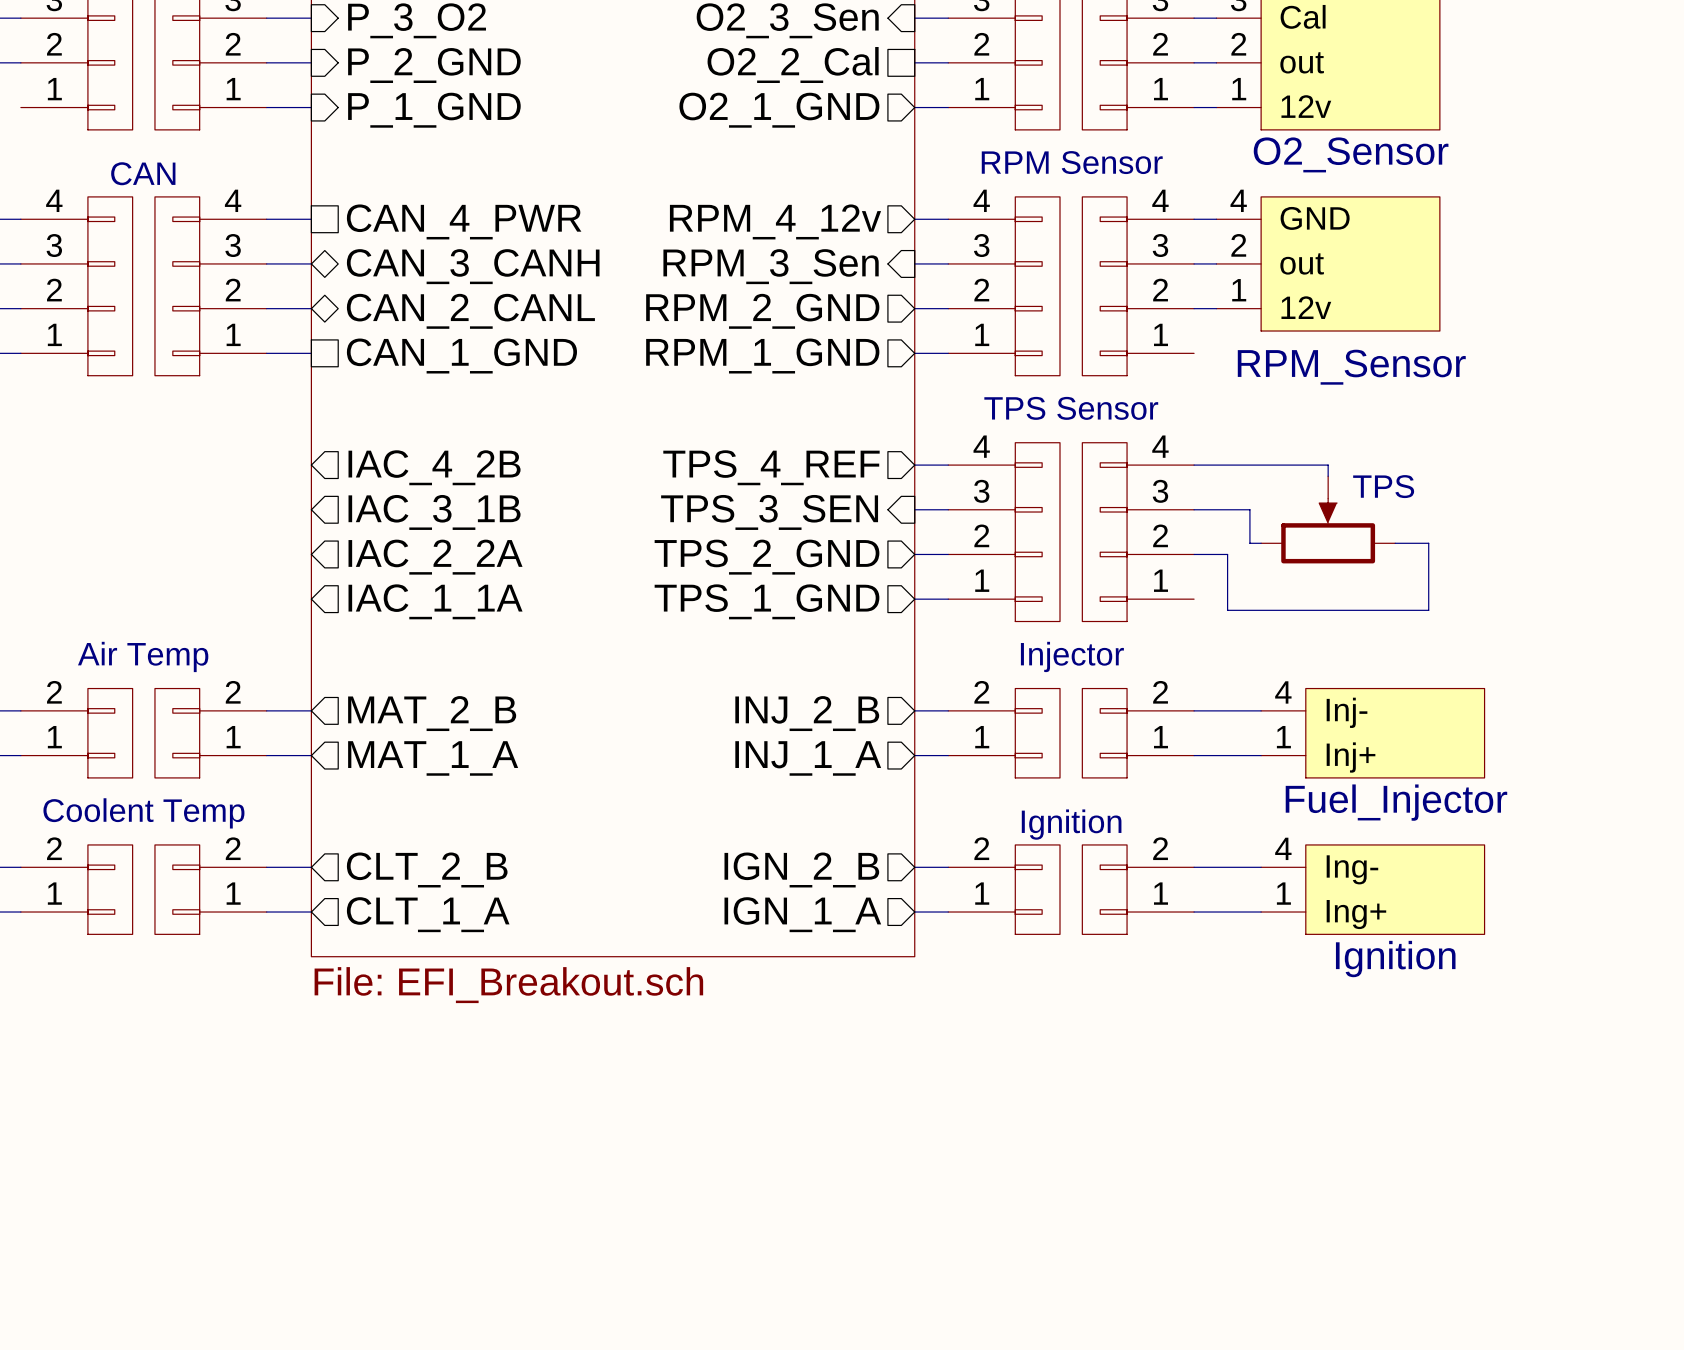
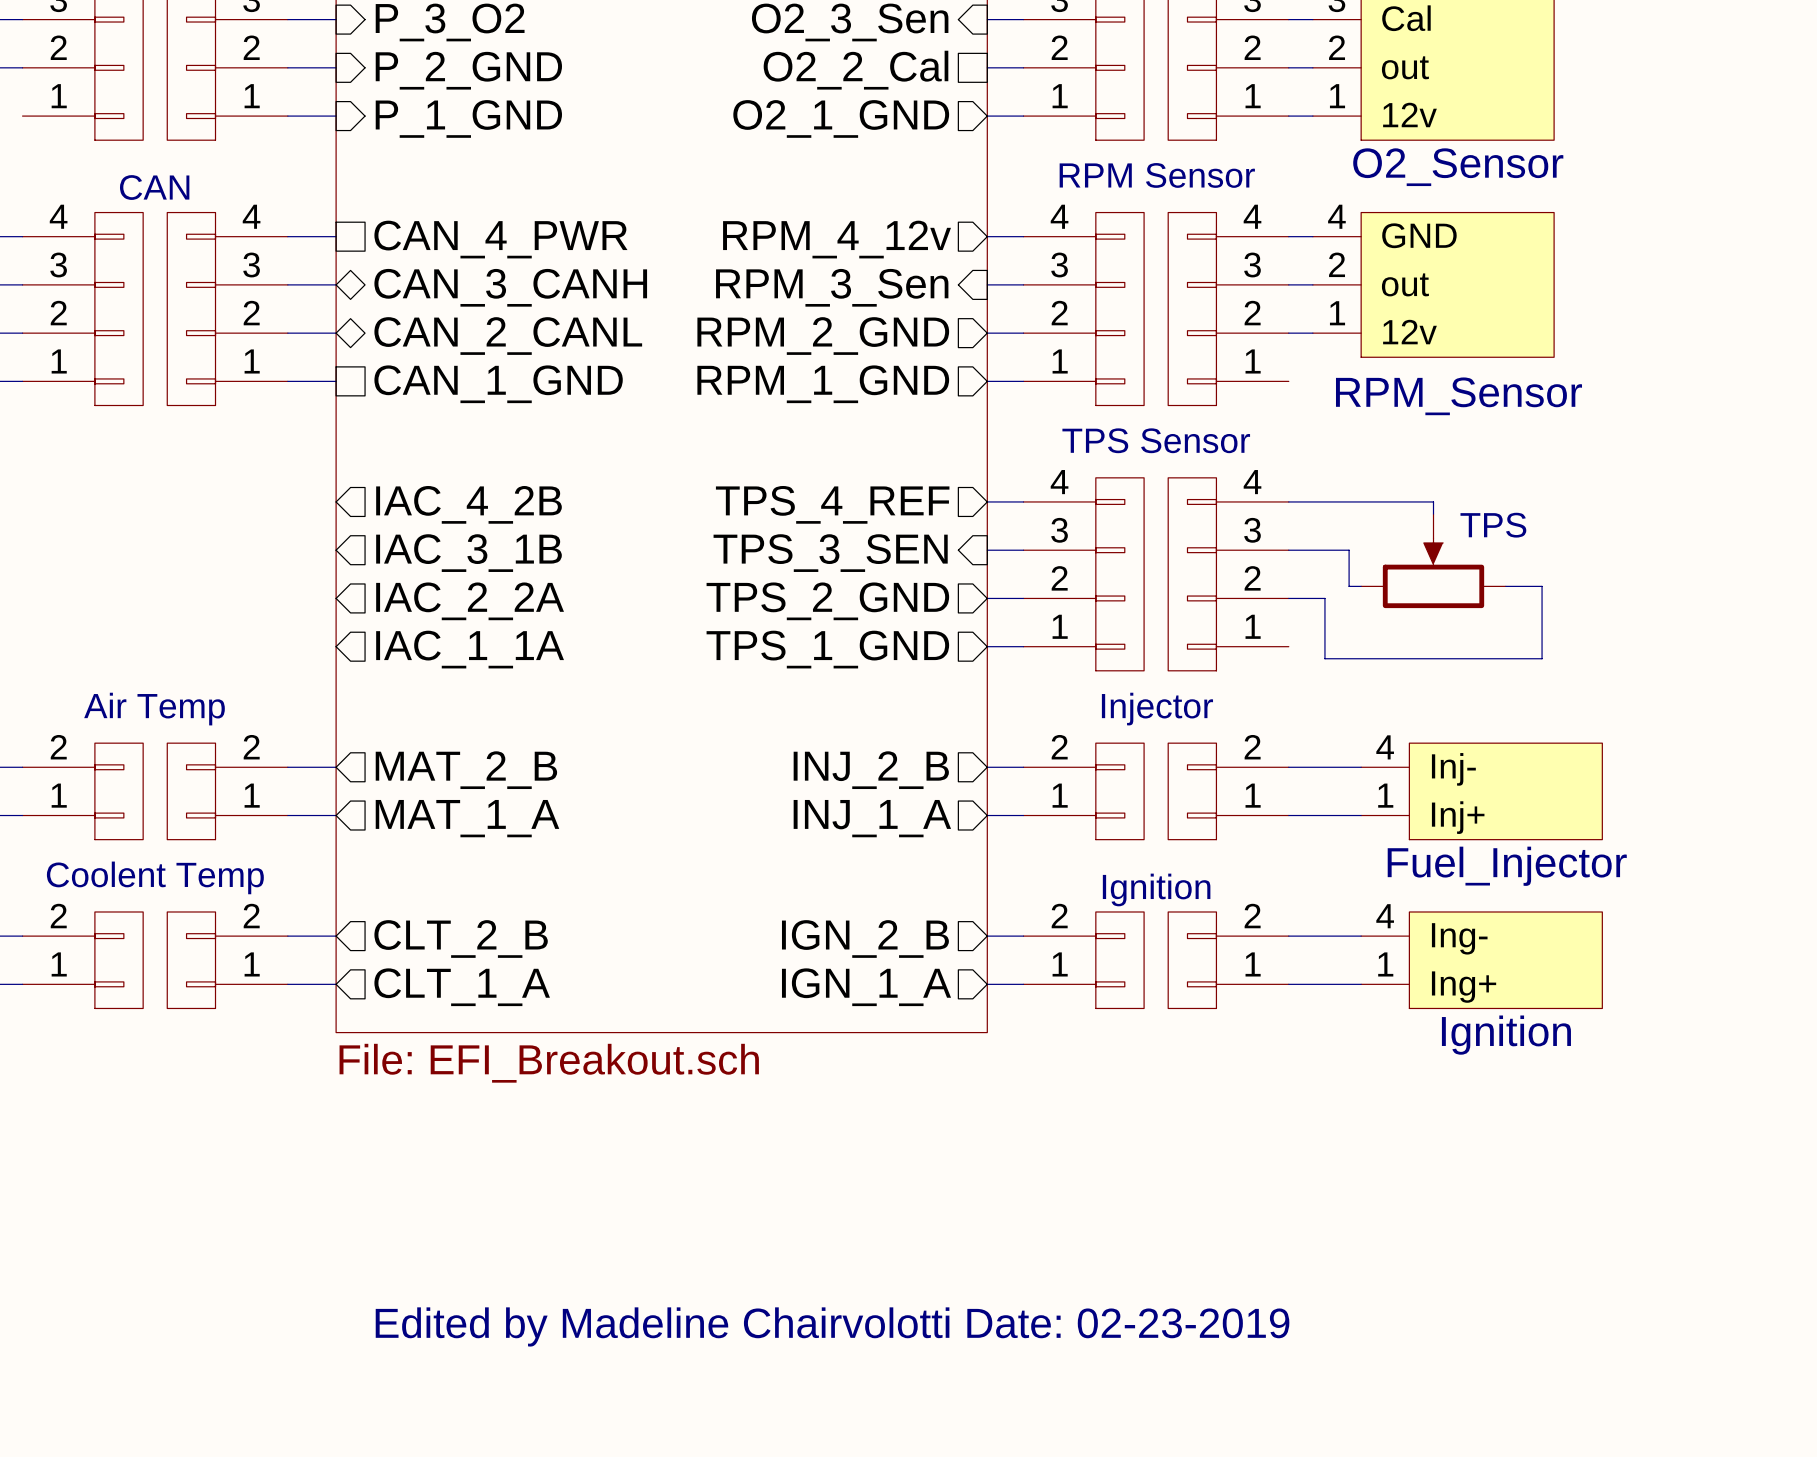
text: none -> Edited by Madeline Chairvolotti Date: 02-23-2019 (832, 1326)

